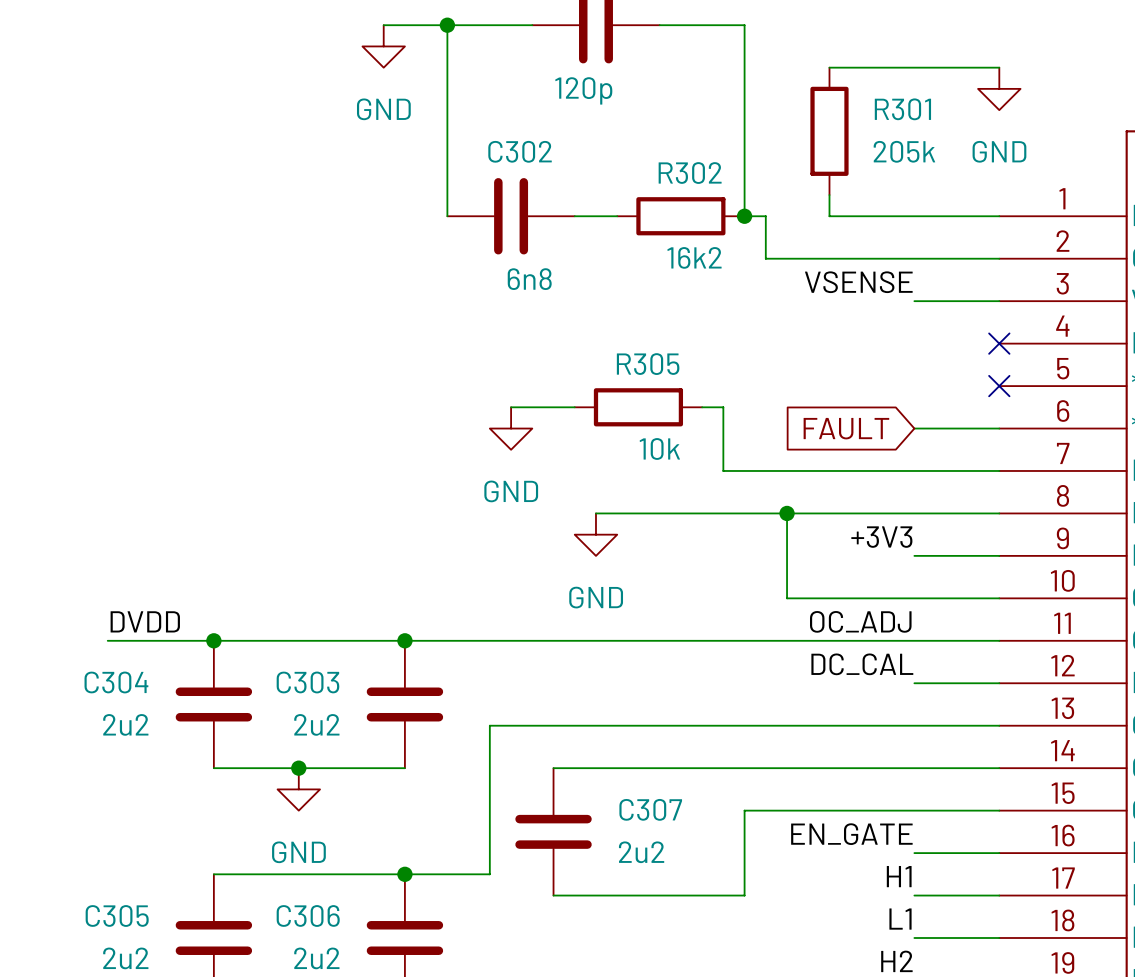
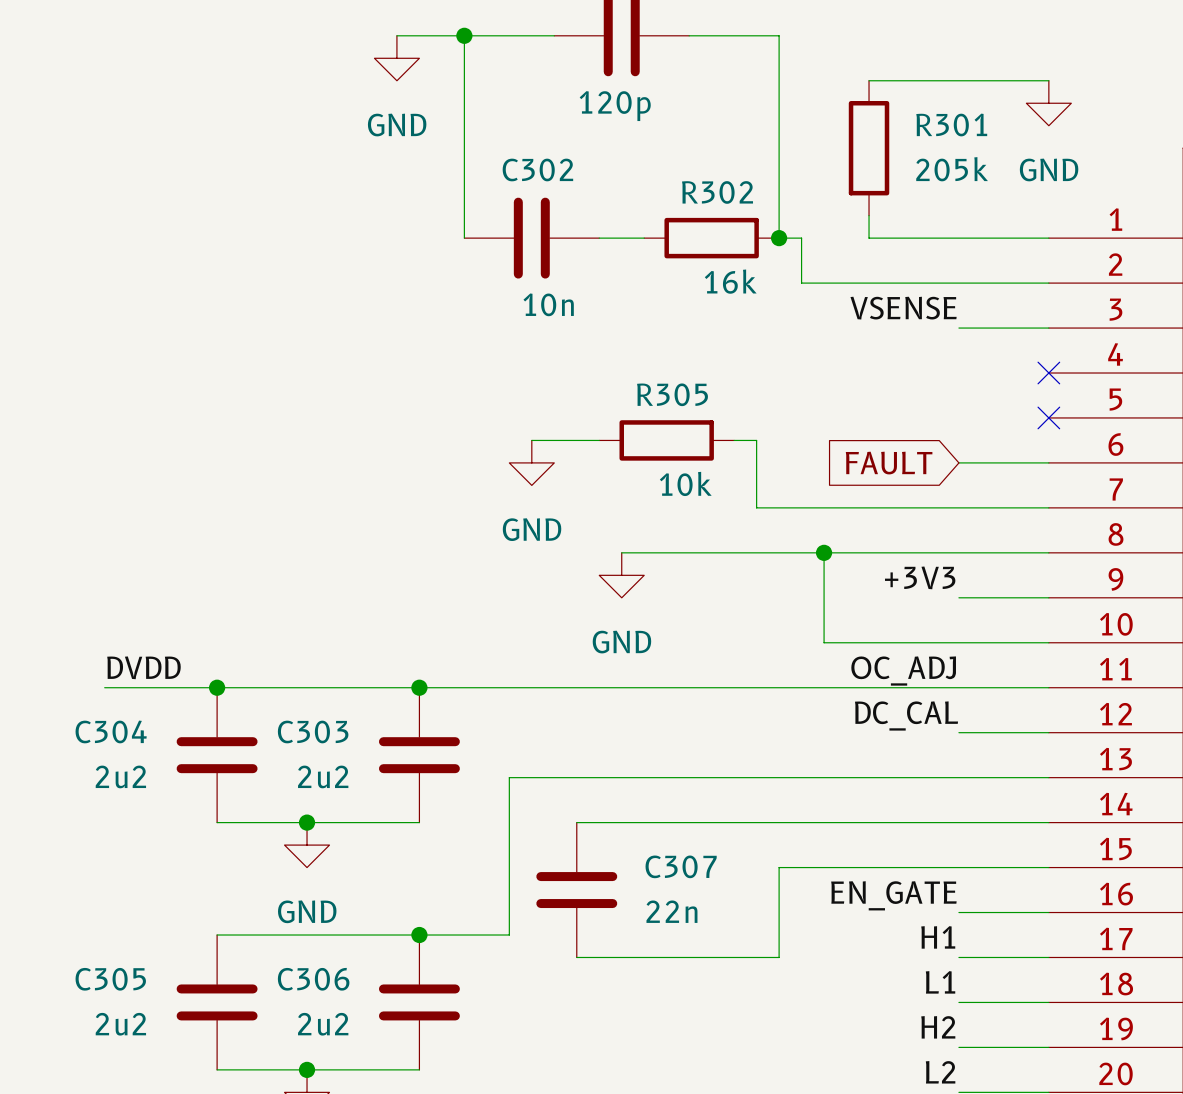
R302 value: 16k2 (694, 257) -> 16k (730, 281)
C302 value: 6n8 (529, 279) -> 10n (548, 304)
C307 value: 2u2 (641, 852) -> 22n (671, 911)

